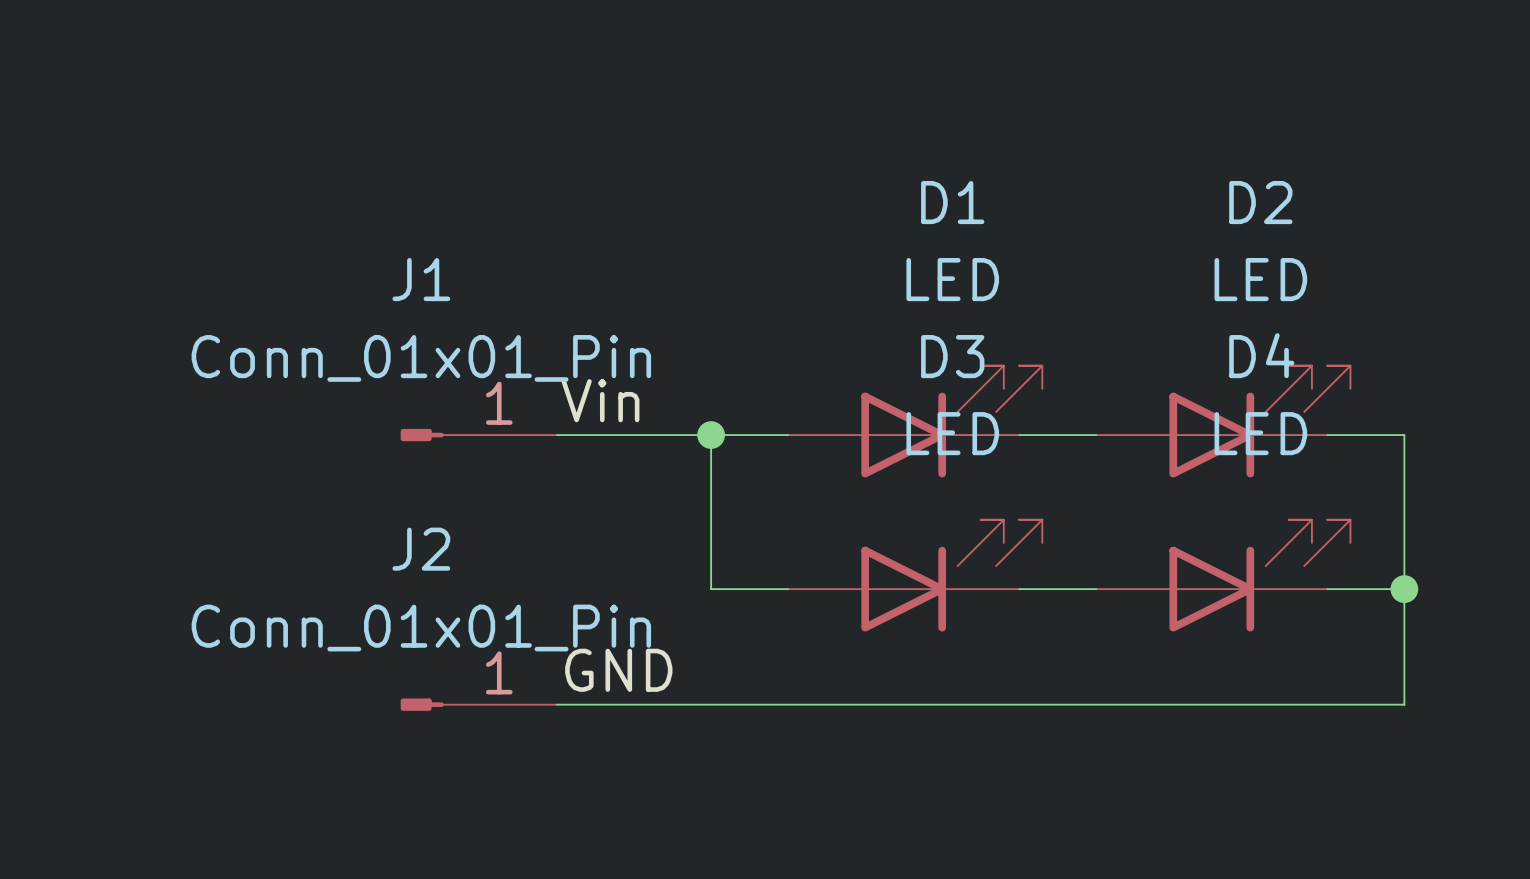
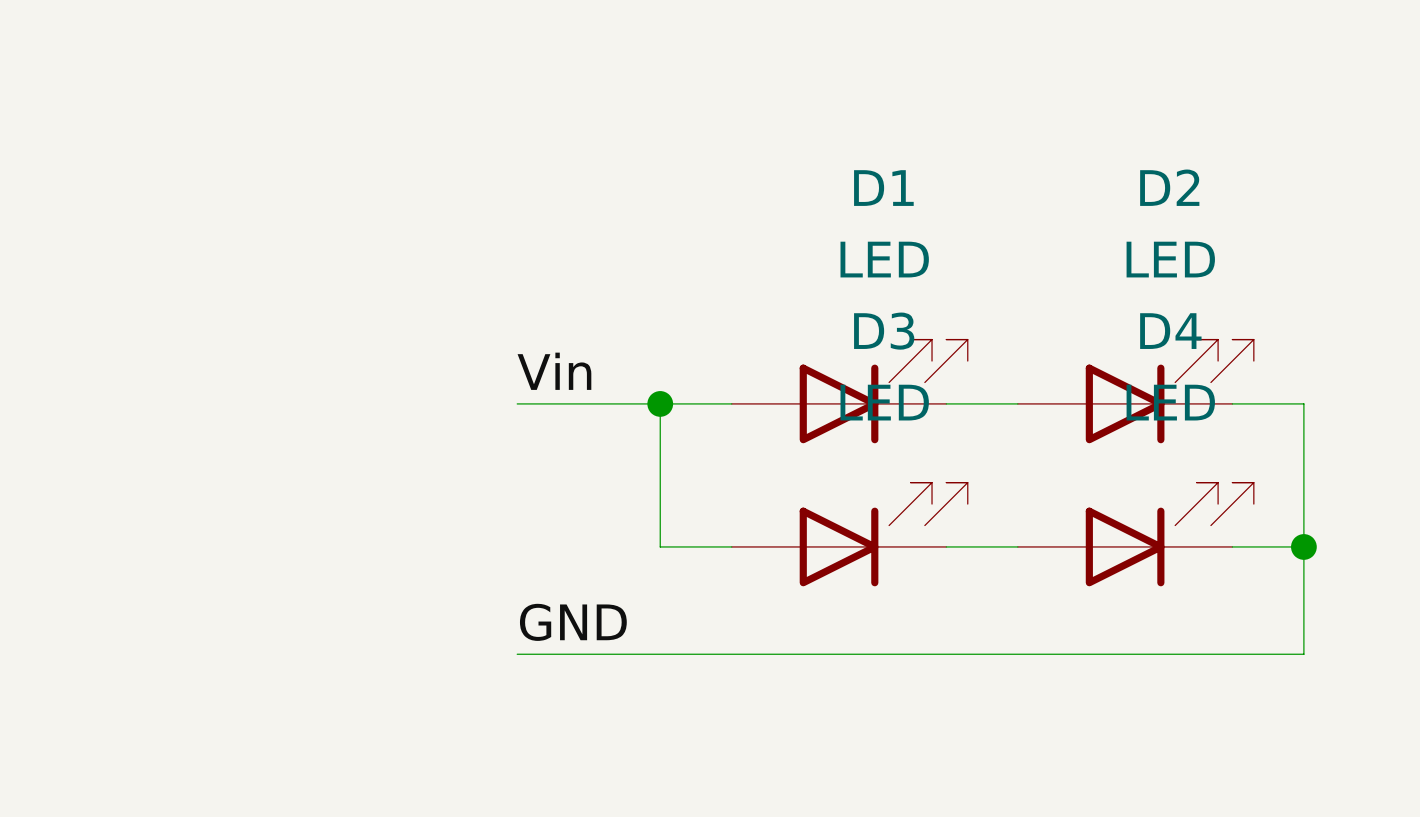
J1: Conn_01x01_Pin (478, 435) -> none
J2: Conn_01x01_Pin (478, 704) -> none

